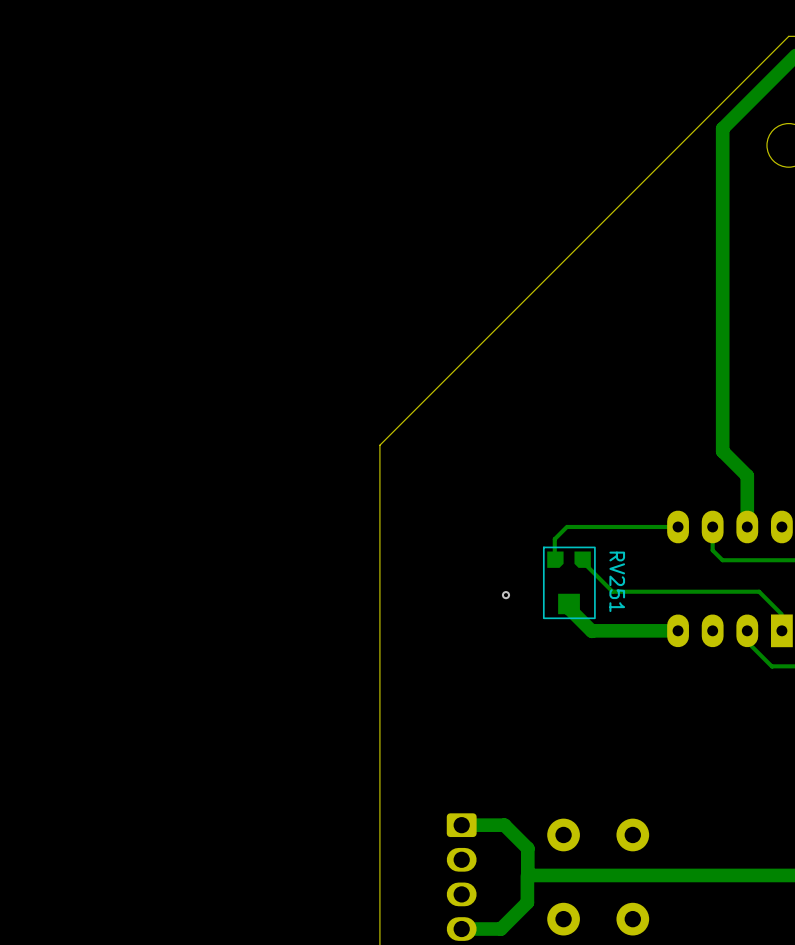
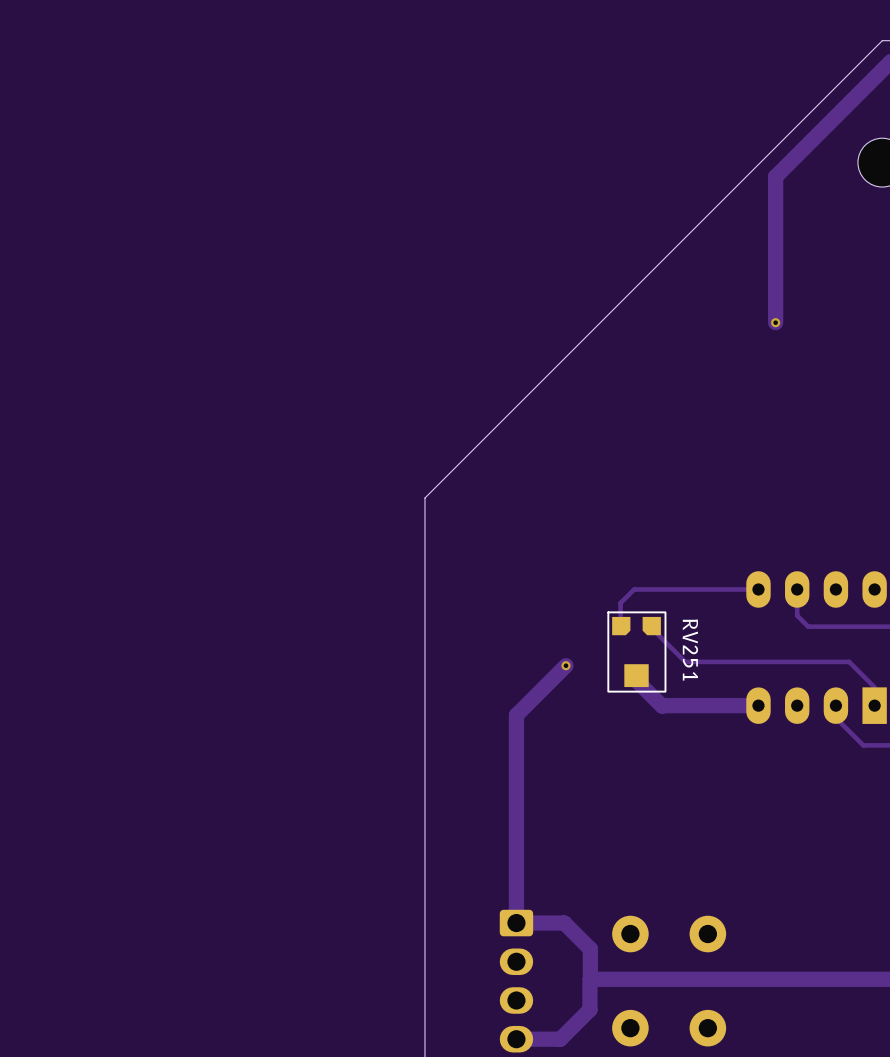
track: (722, 128) (722, 451) (747, 475) (747, 526) -> (808, 144) (775, 176) (775, 322)
via: none -> (775, 322)
track: none -> (566, 665) (516, 715) (516, 923)

